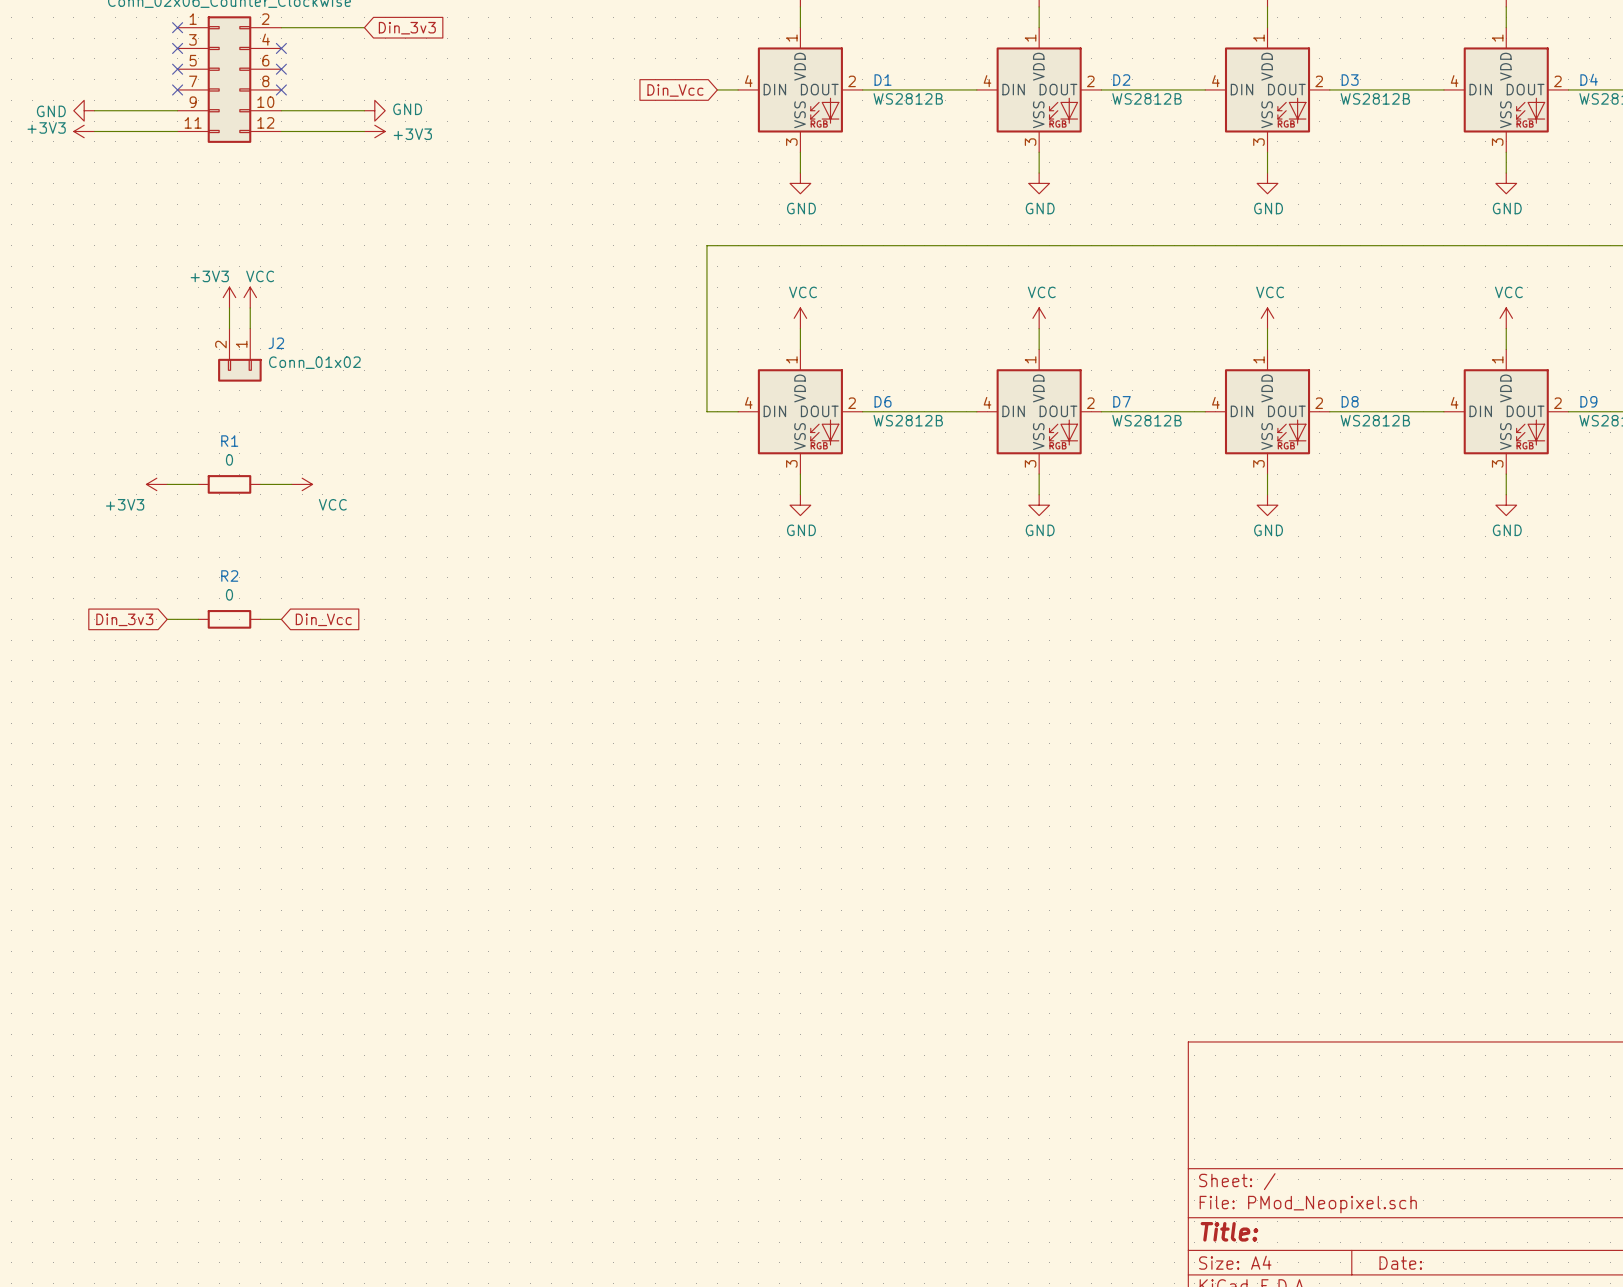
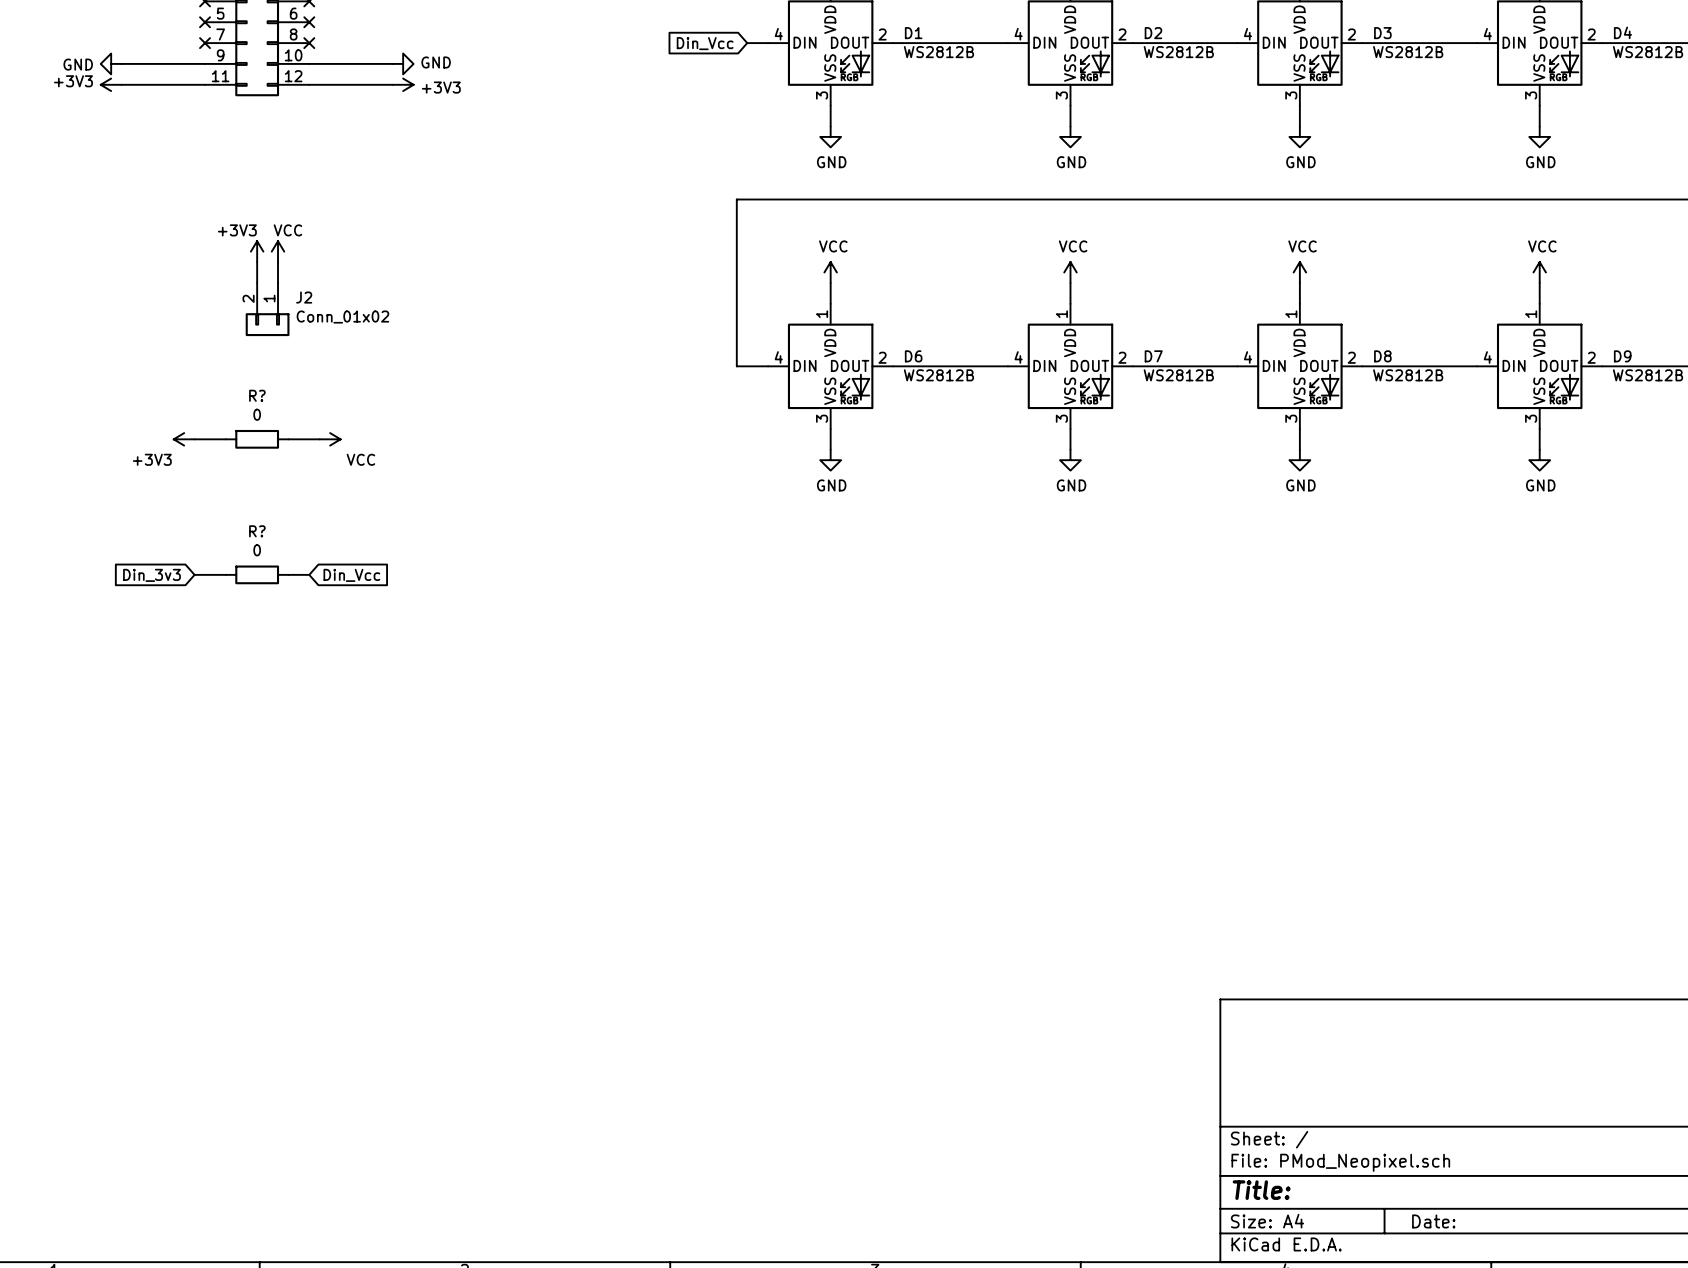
R1 name: R1 (229, 441) -> R? (257, 395)
R2 name: R2 (229, 576) -> R? (257, 531)

